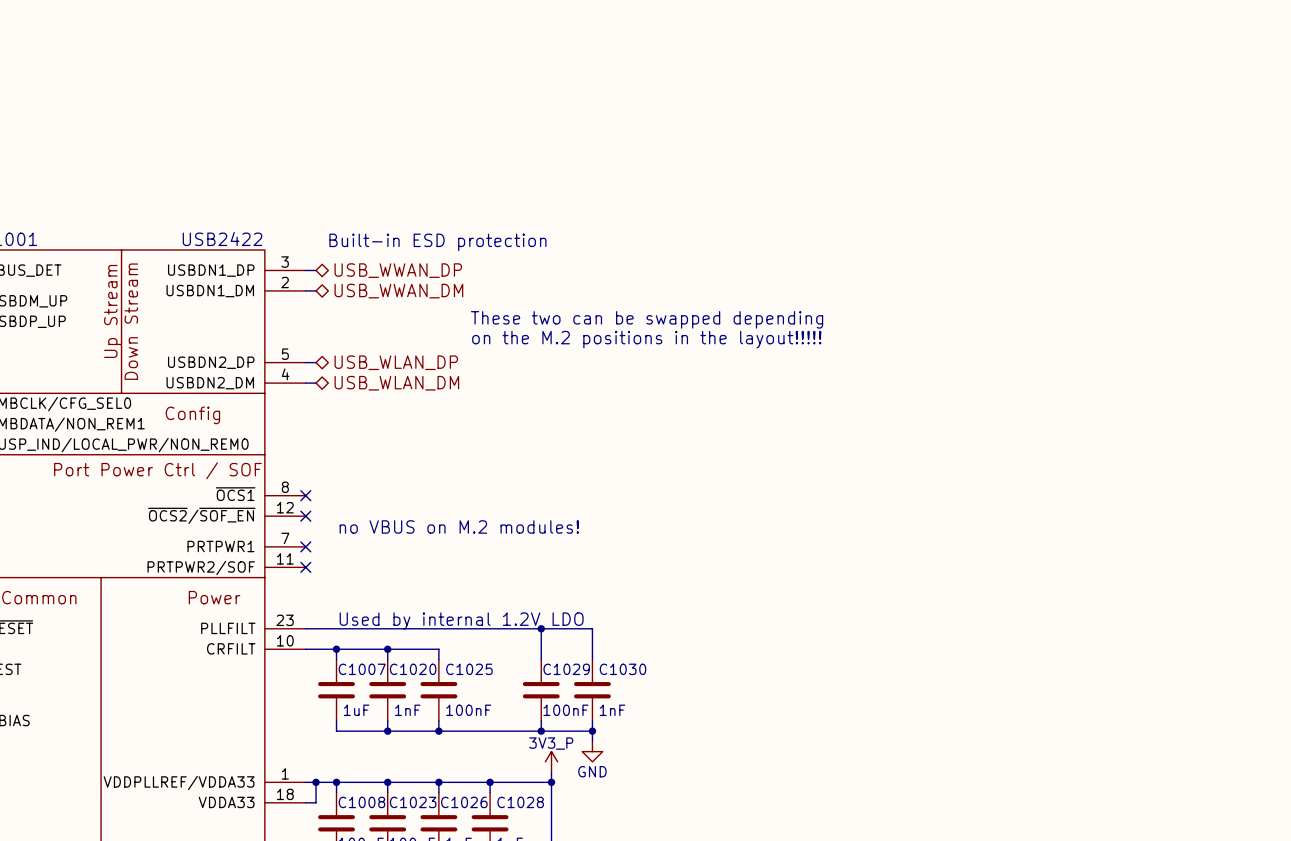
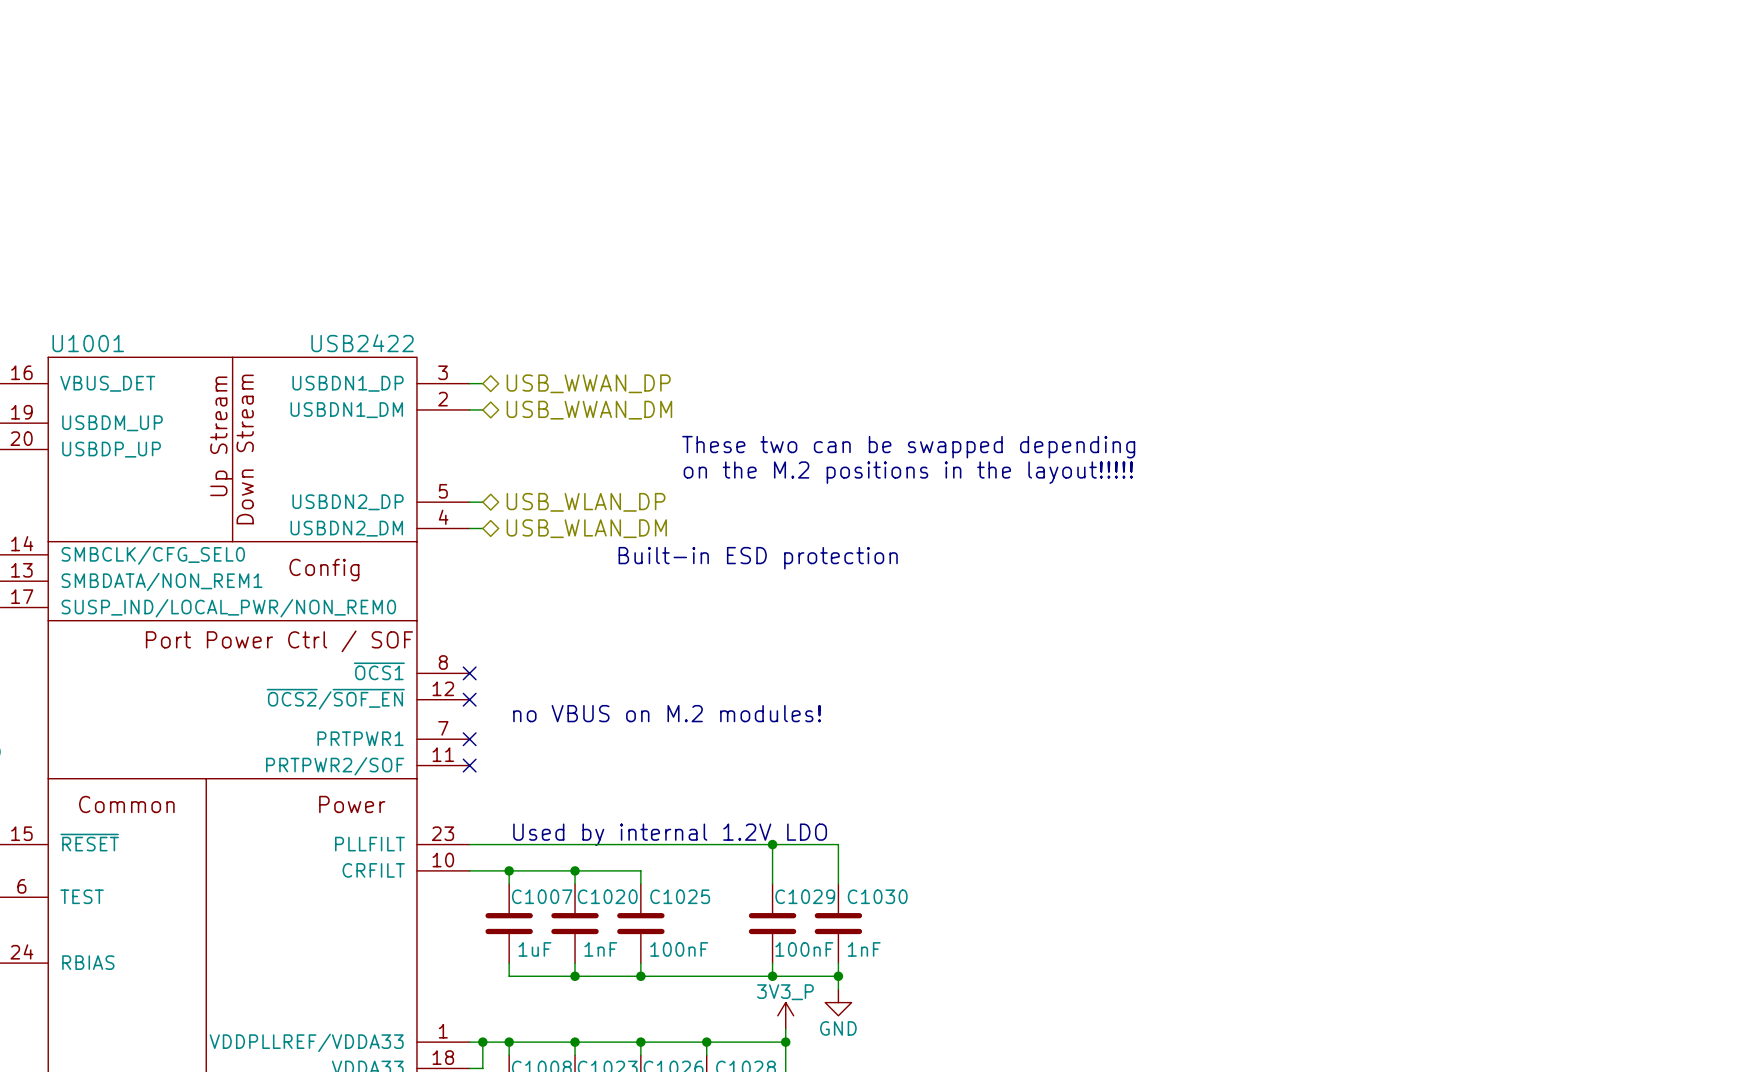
text position: Built-in ESD protection (437, 242) -> Built-in ESD protection (758, 558)

